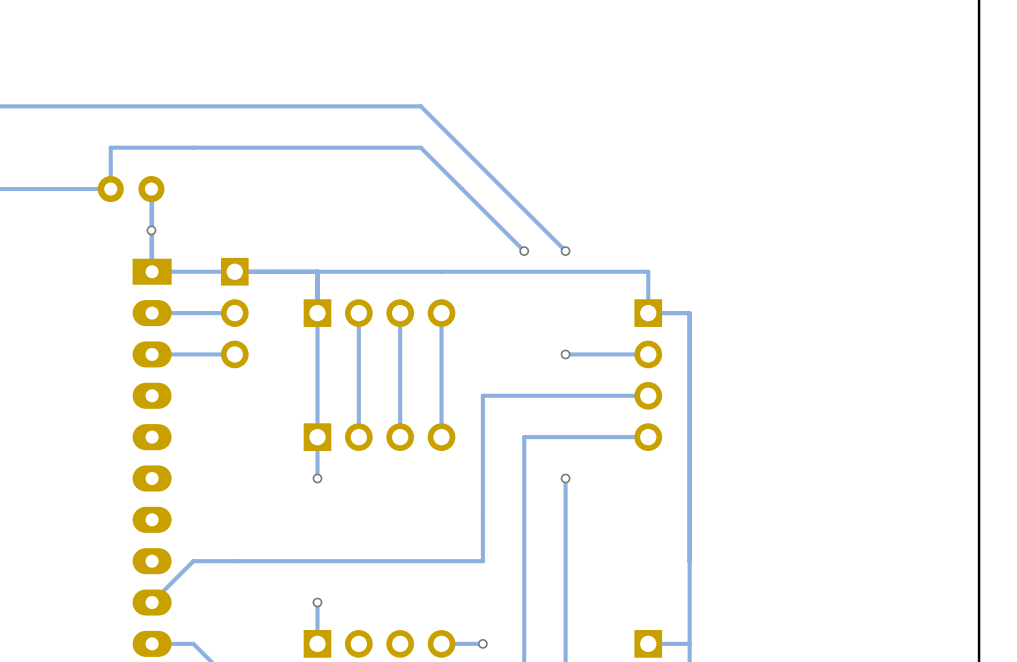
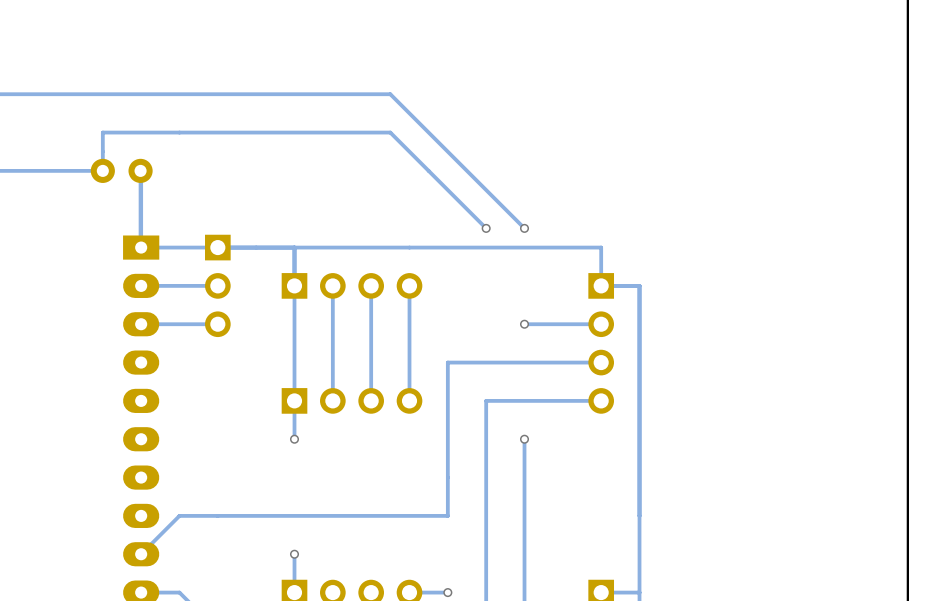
via: (151, 230) -> none

